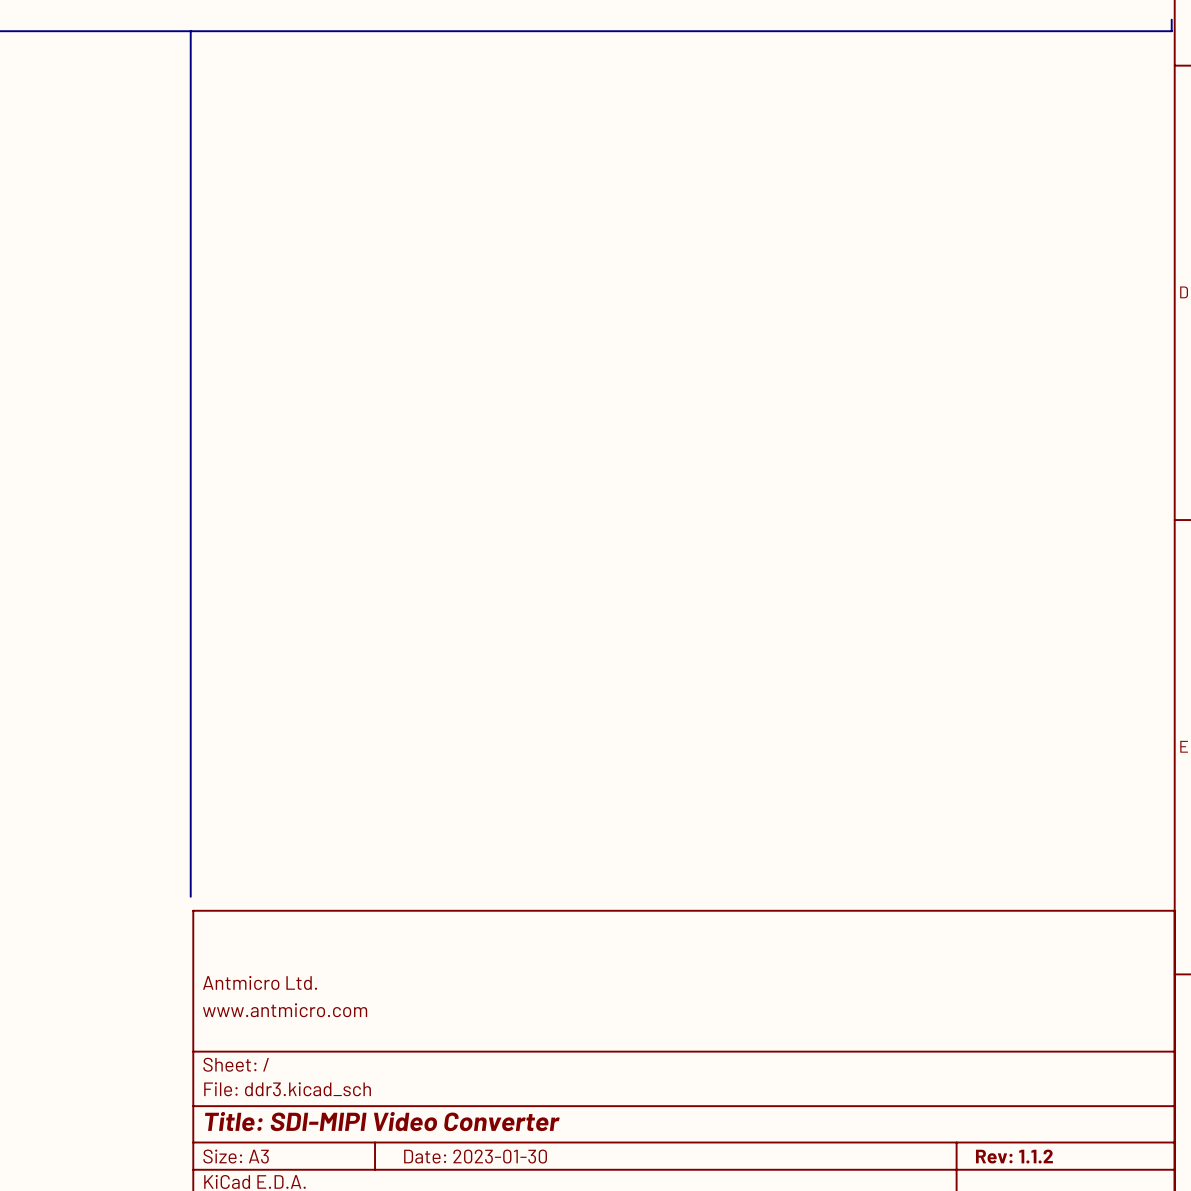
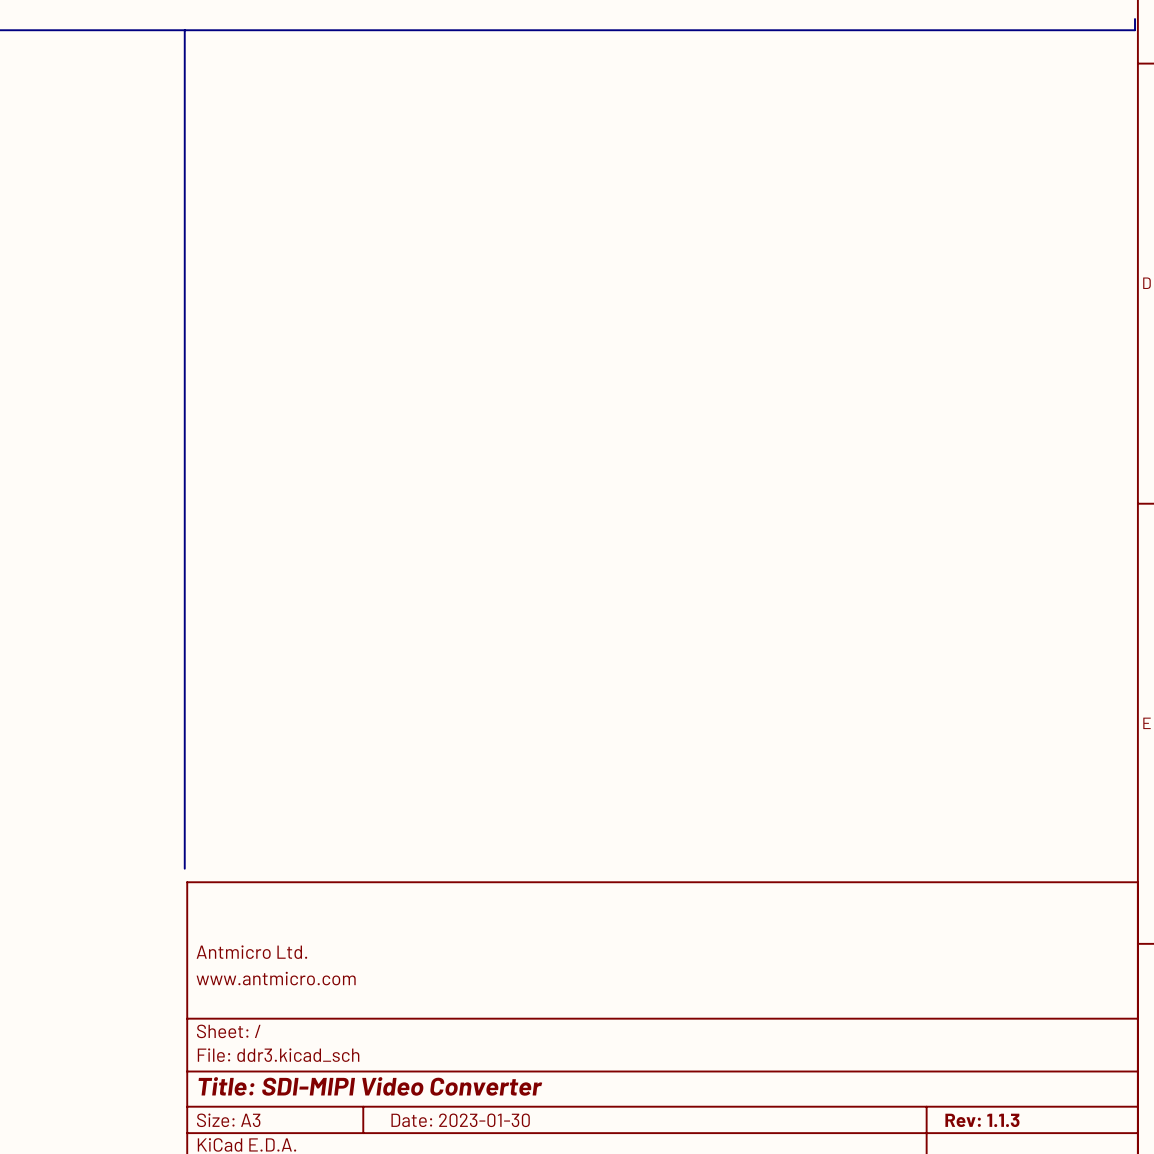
title block: Rev: 1.1.2 (1014, 1156) -> Rev: 1.1.3 (982, 1120)

